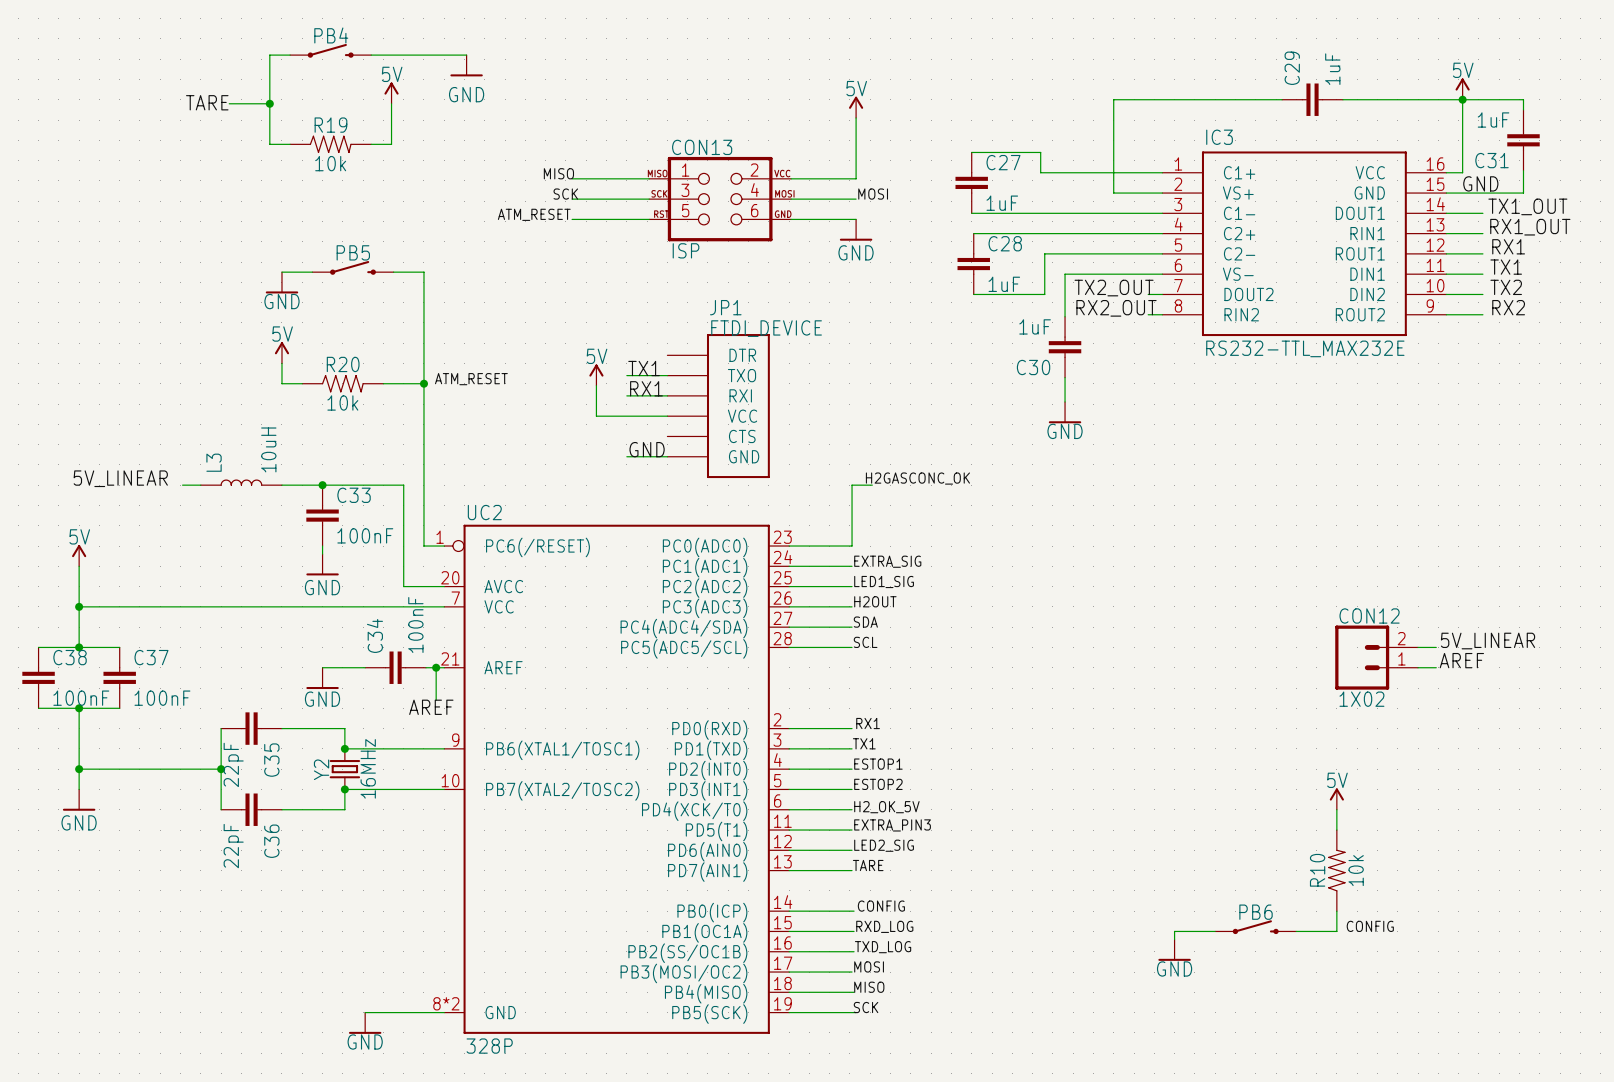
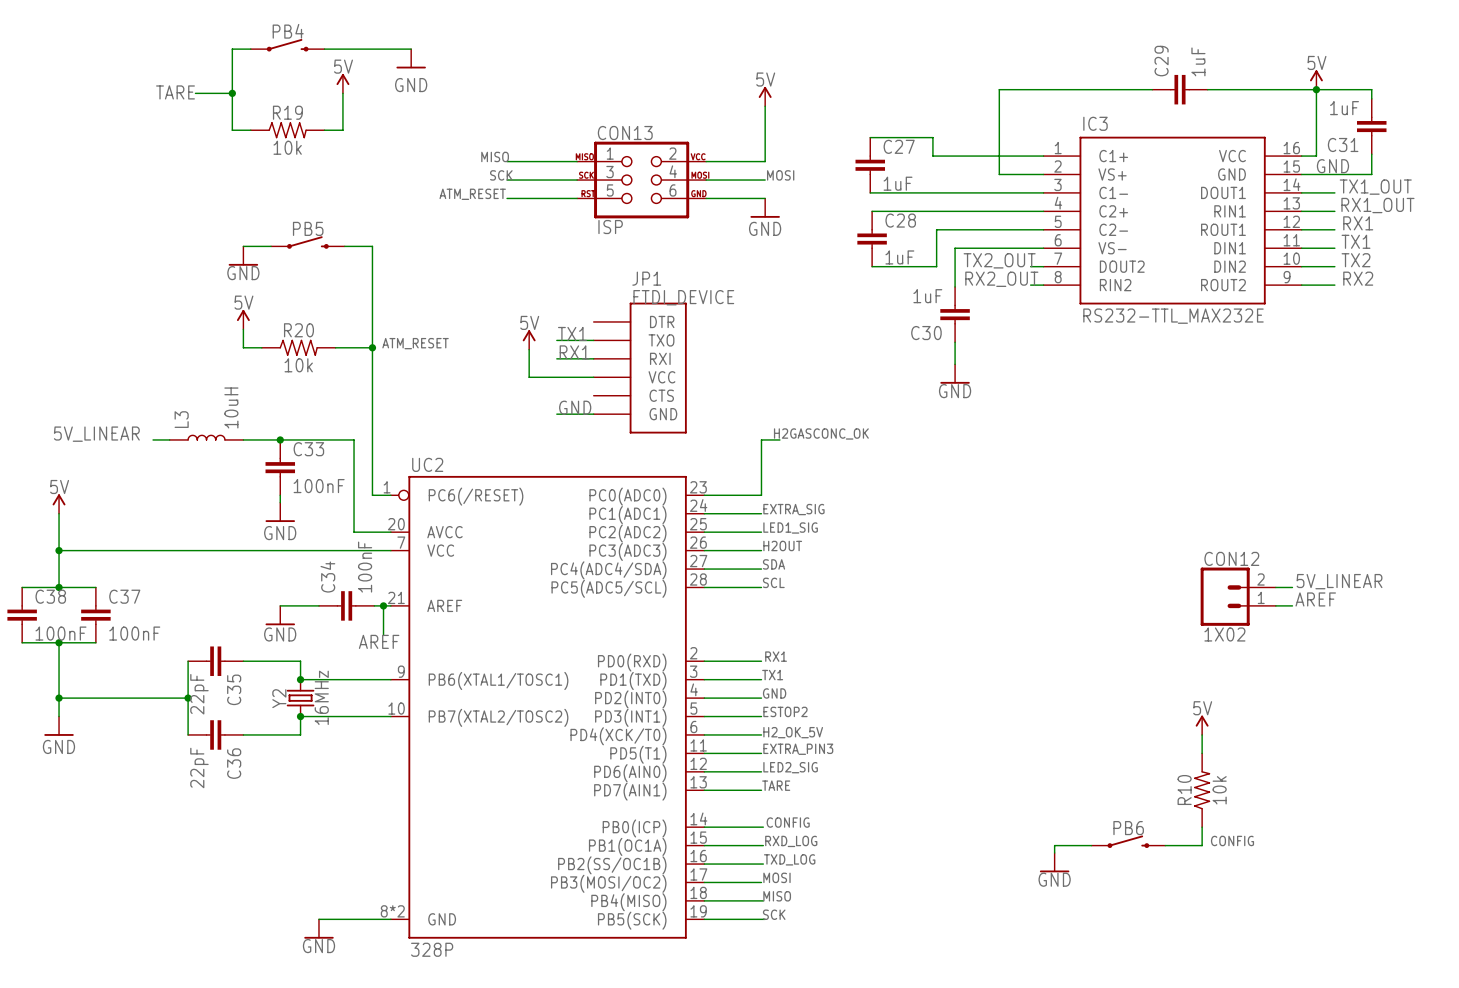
label: ESTOP1 (878, 764) -> GND (774, 693)

